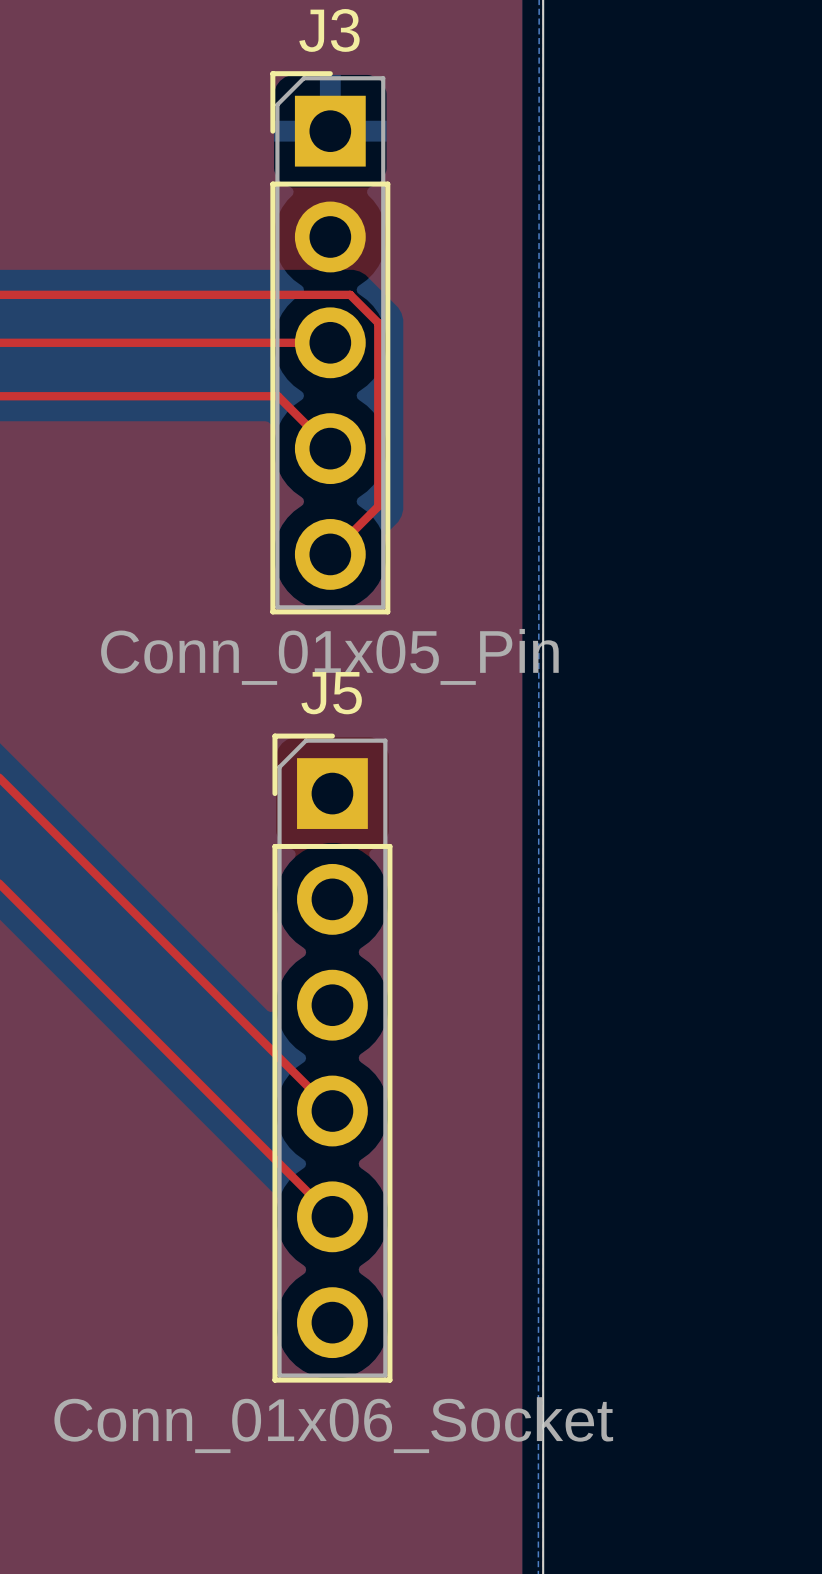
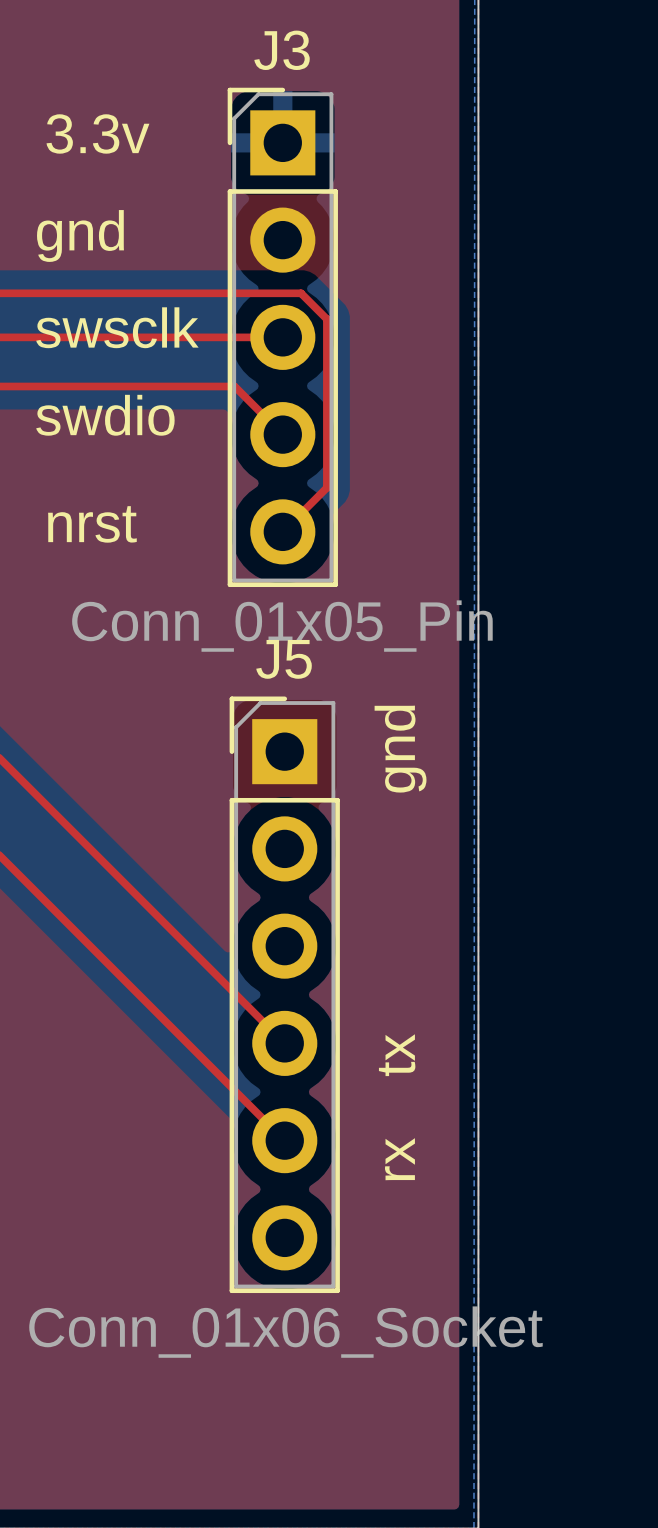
text: none -> 3.3v (97, 133)
text: none -> gnd (80, 235)
text: none -> swsclk (117, 327)
text: none -> swdio (105, 415)
text: none -> nrst (92, 524)
text: none -> gnd (400, 749)
text: none -> tx (397, 1055)
text: none -> rx (399, 1159)

